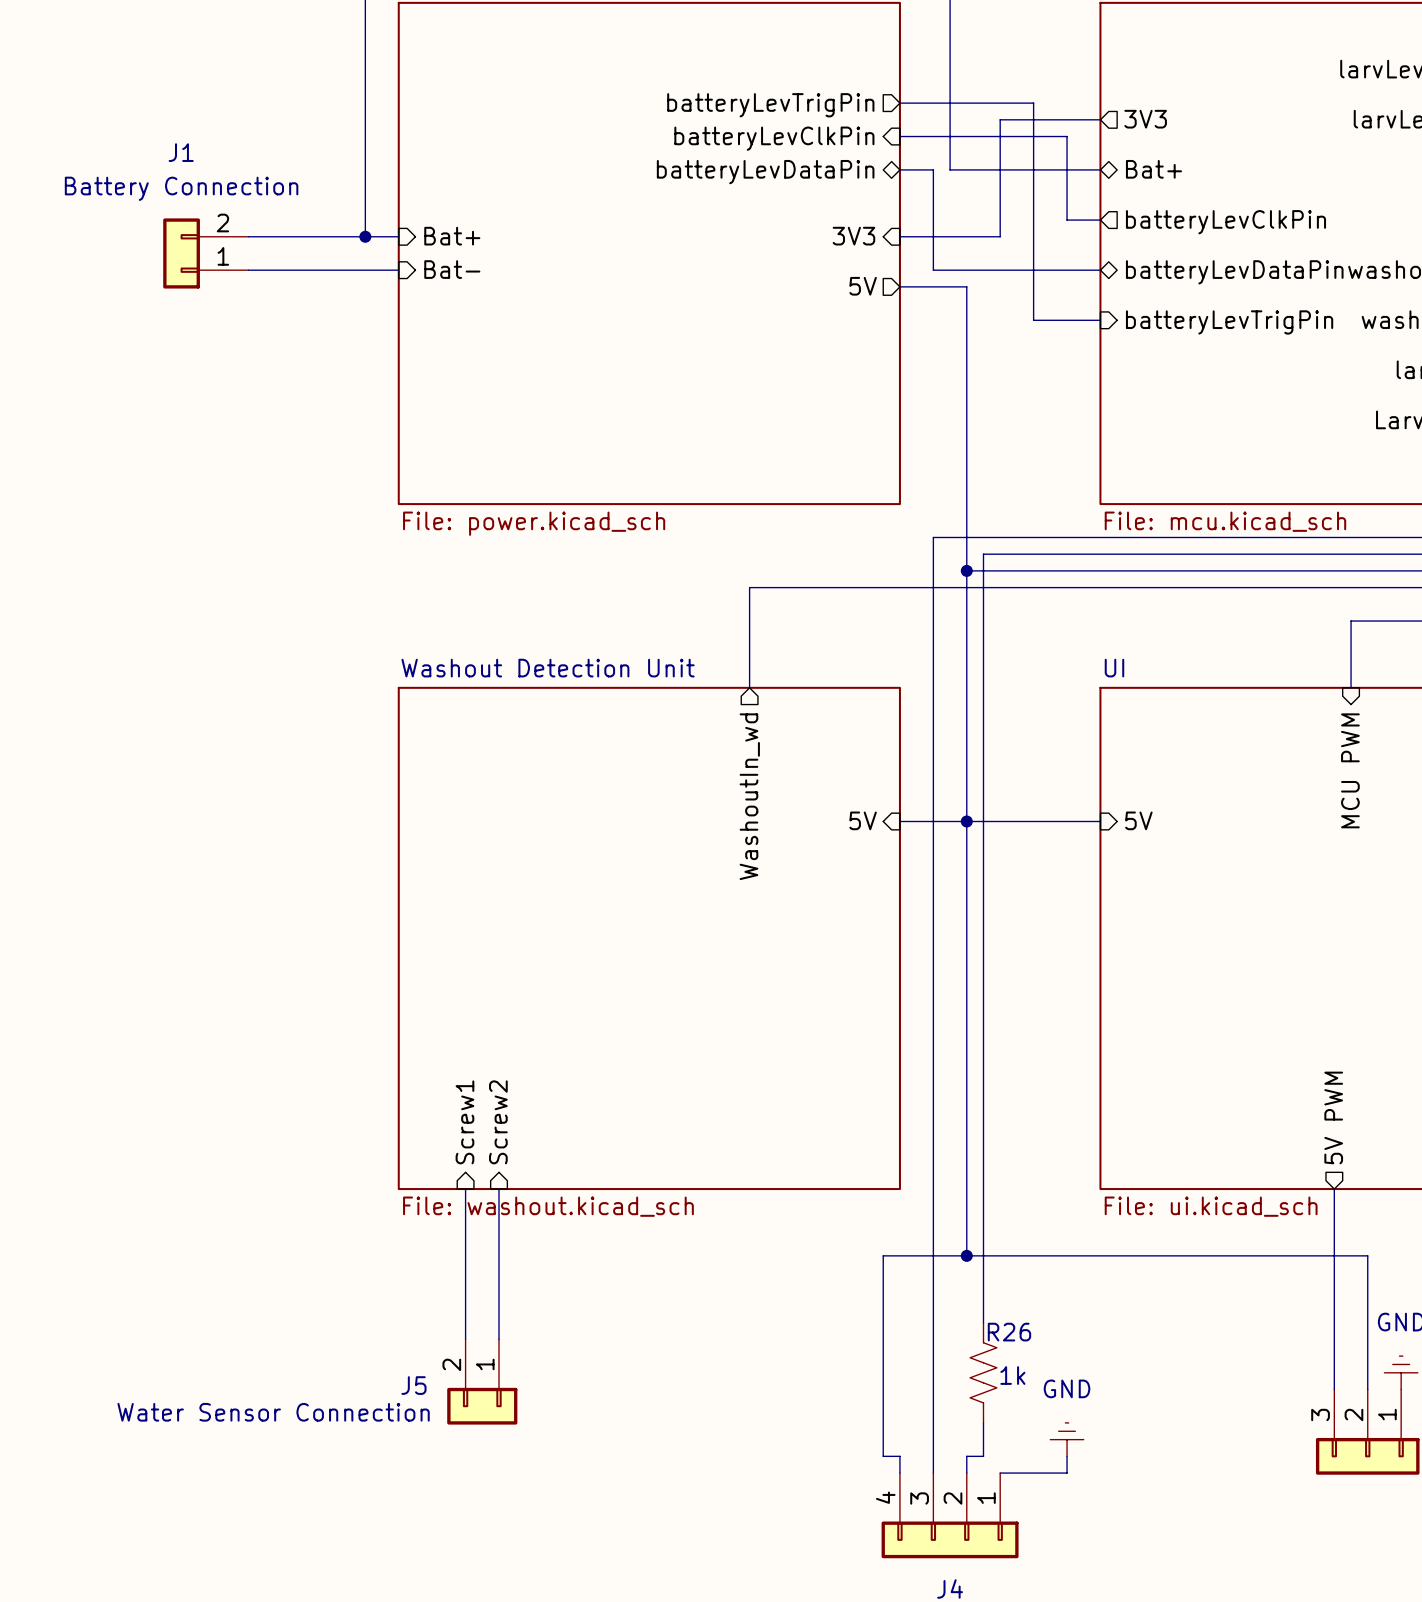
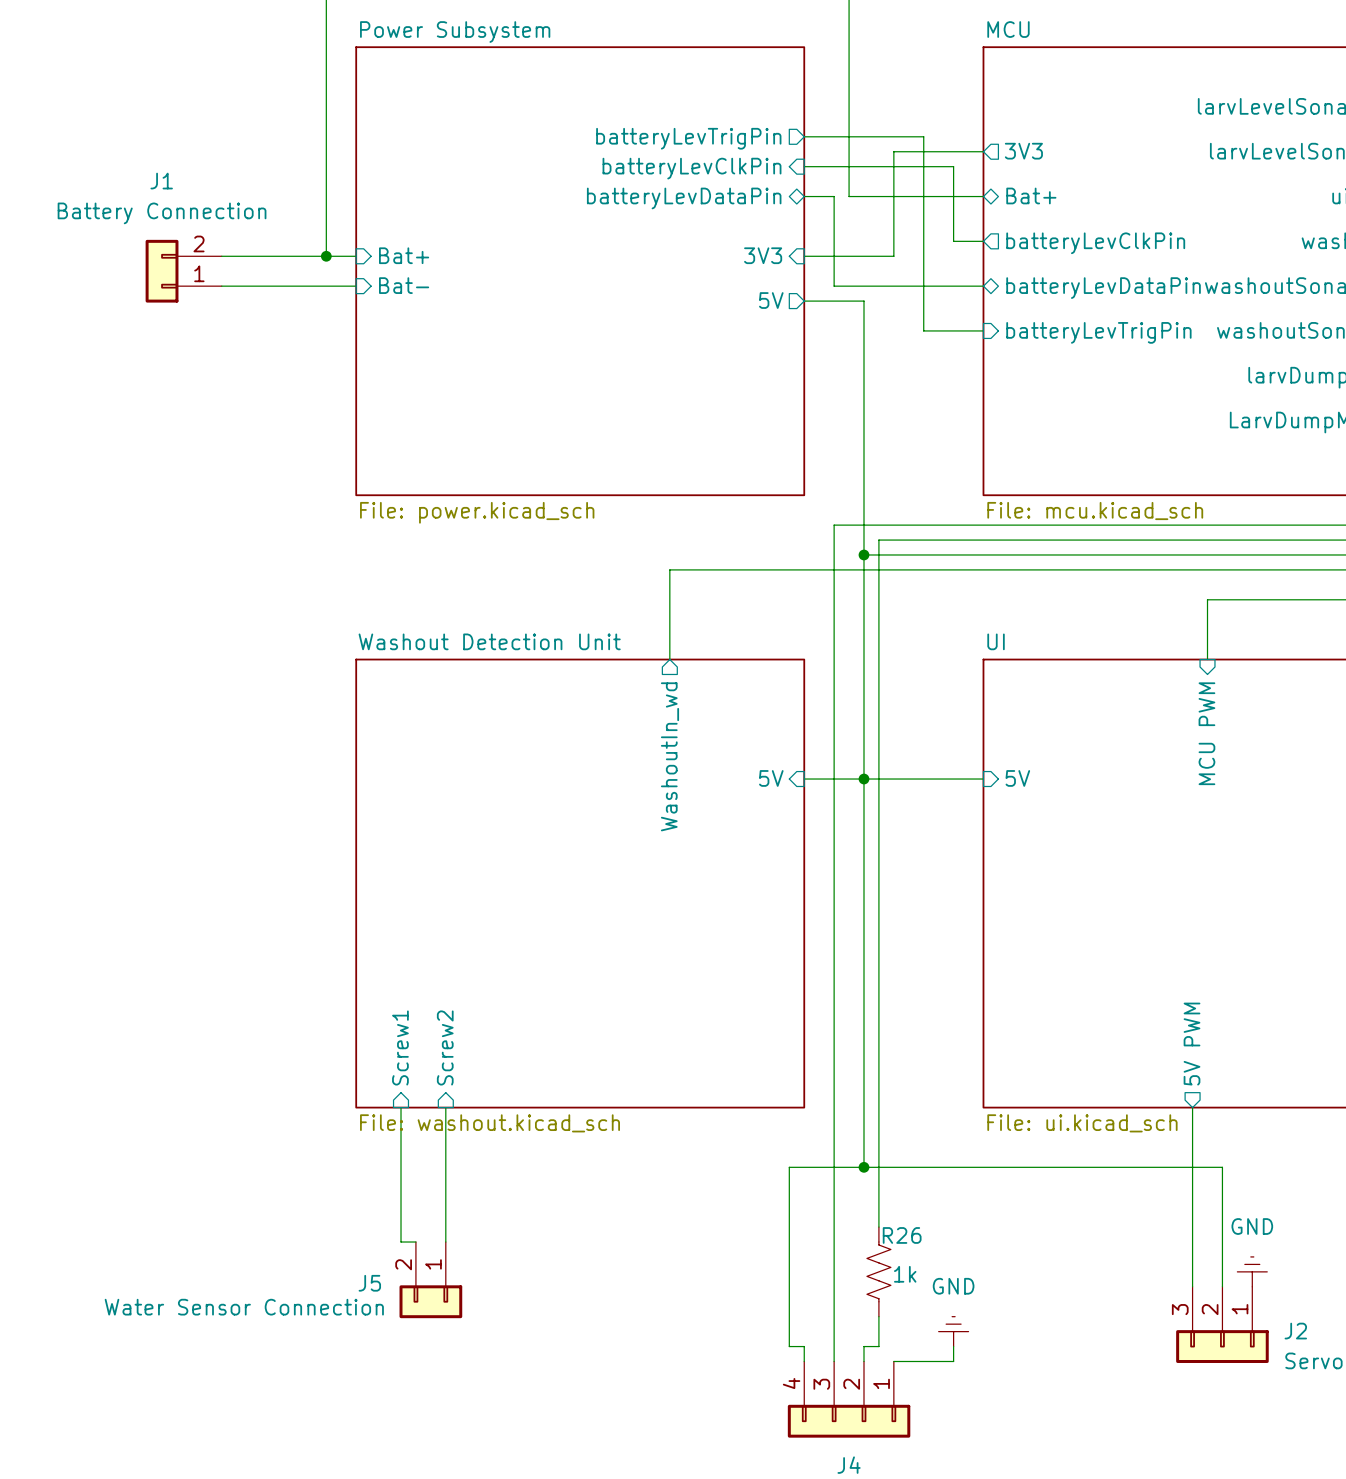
sheet pin position: Screw1 (464, 1122) -> Screw1 (400, 1047)
wire: (465, 1189) (465, 1339) -> (401, 1107) (401, 1242) (415, 1242)

